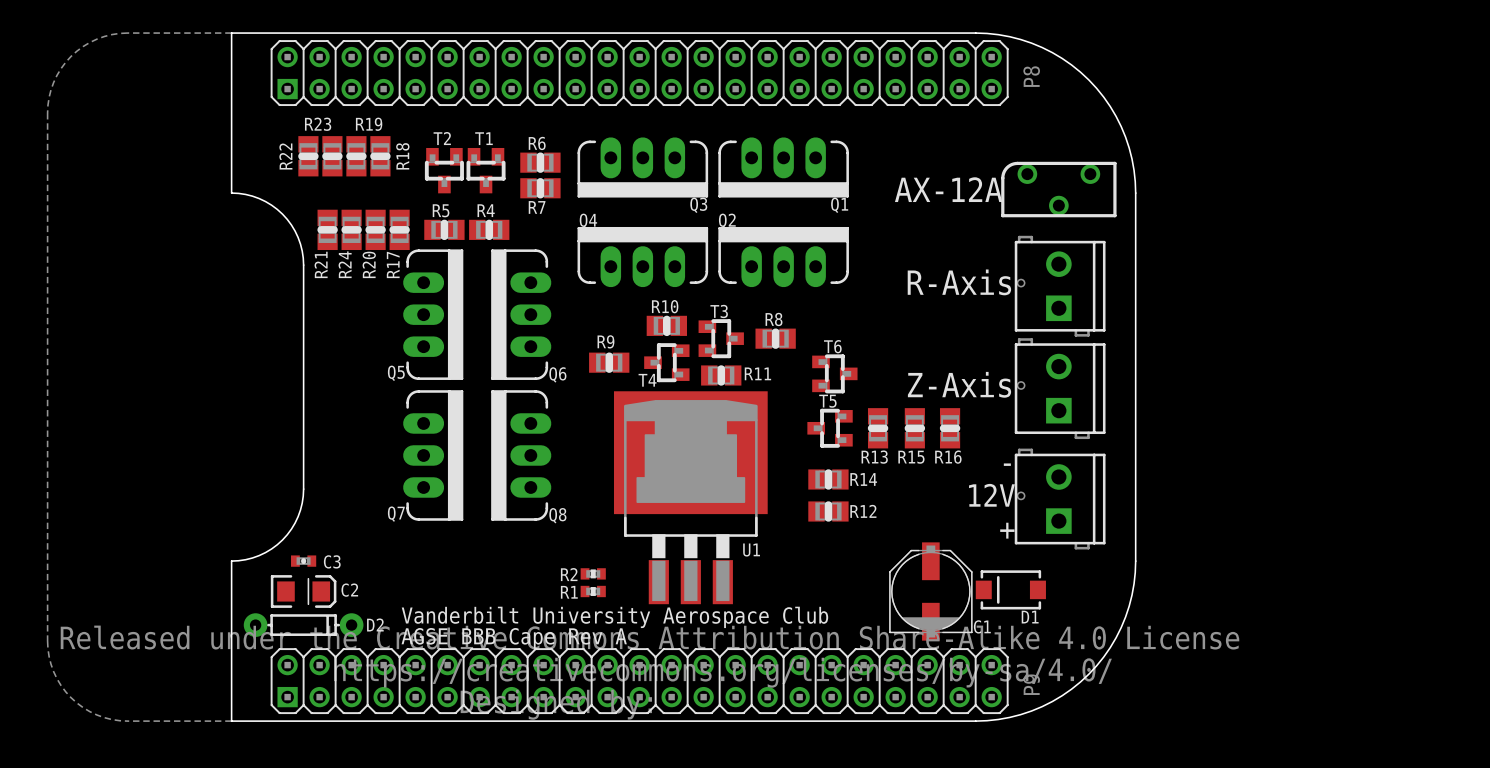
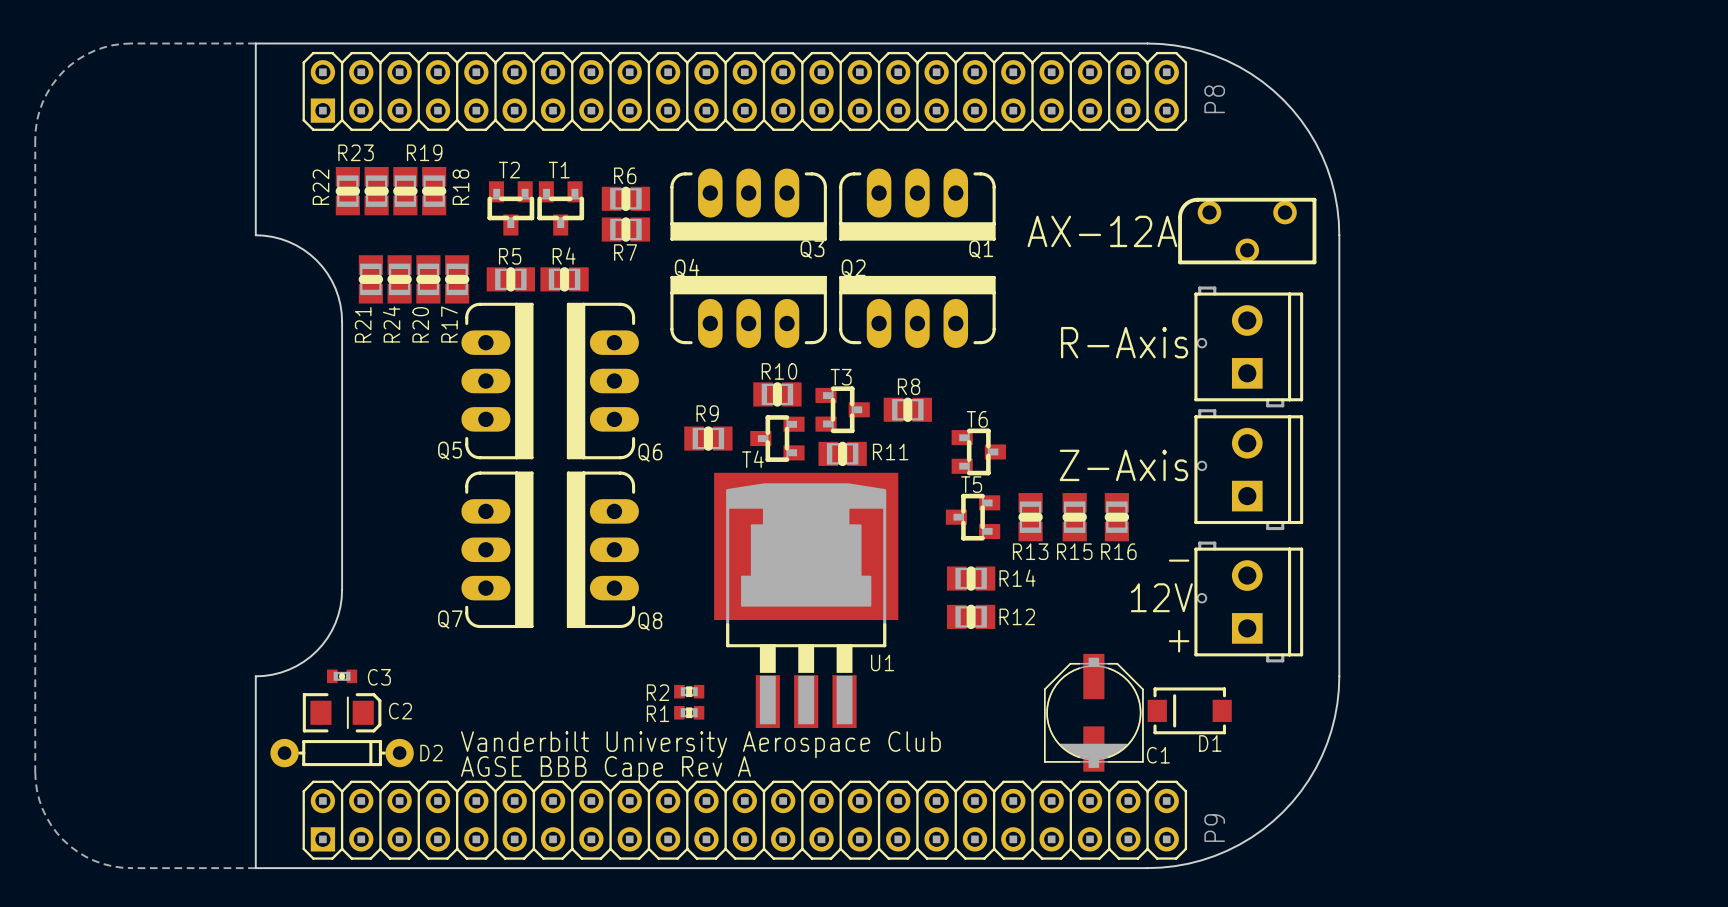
drawing: [60, 625, 1240, 720] -> none

